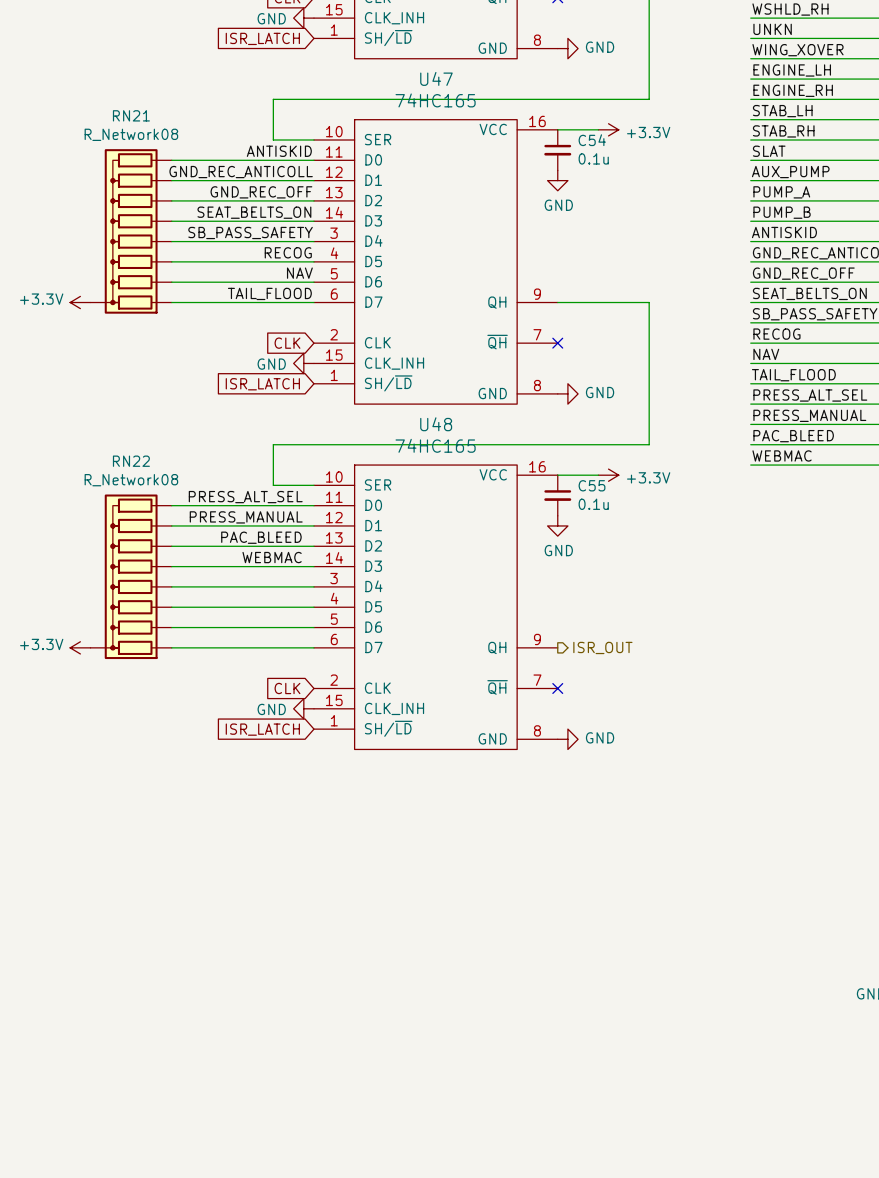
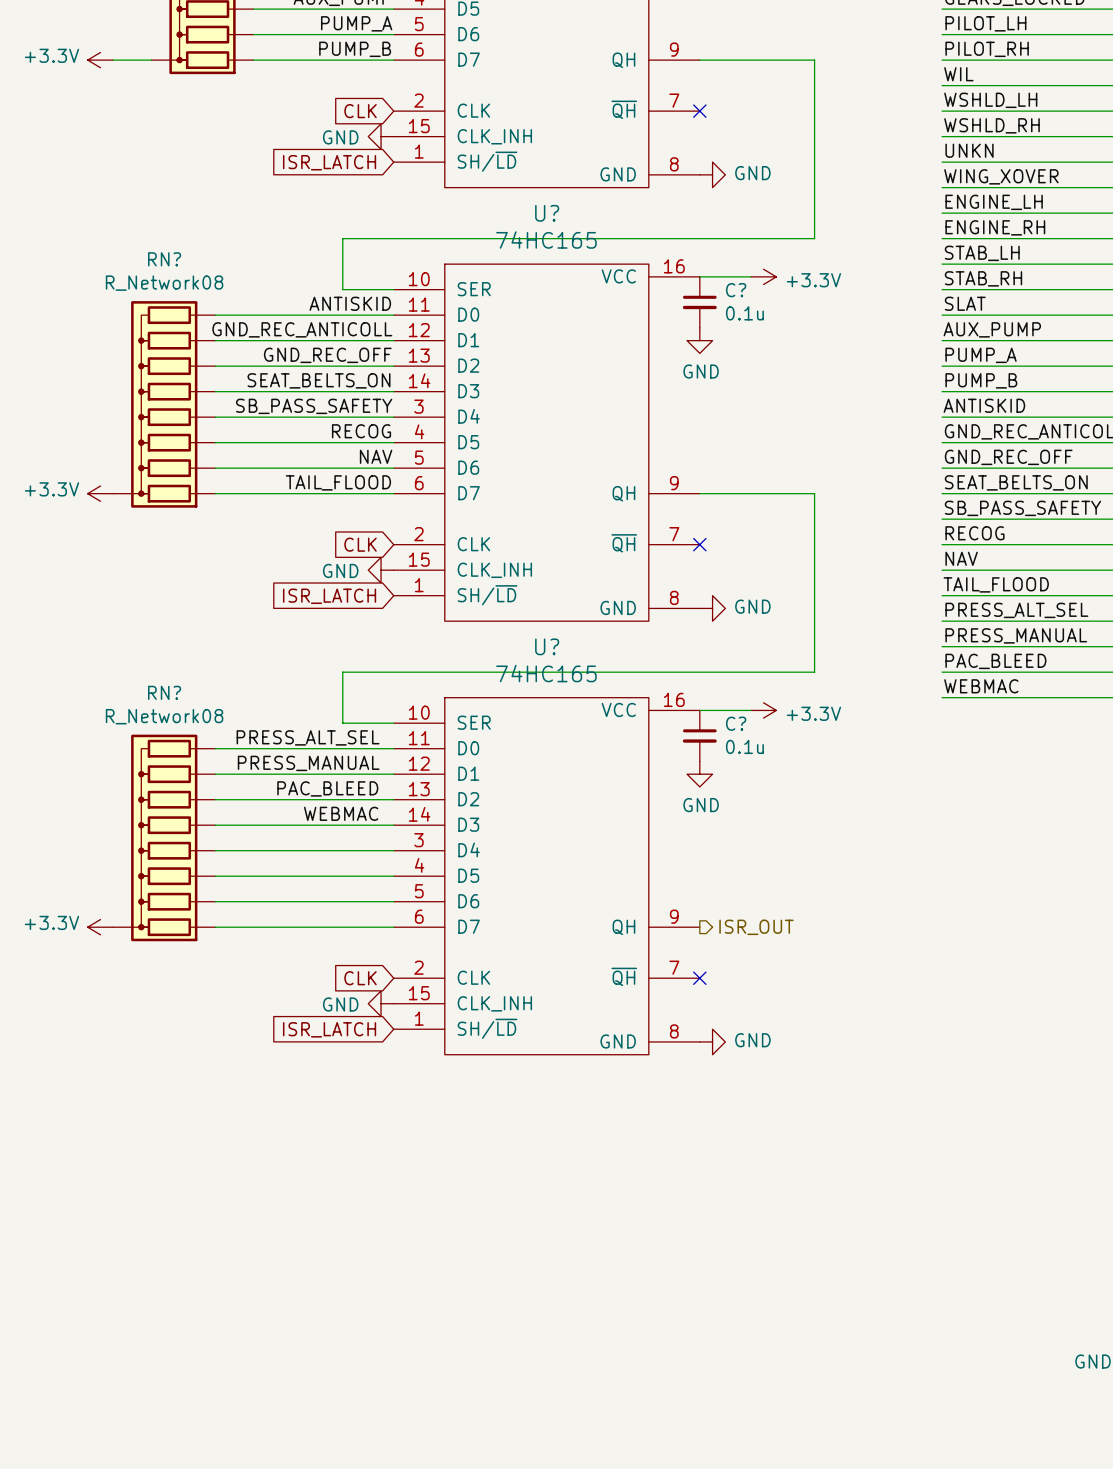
U47 name: U47 (436, 78) -> U? (547, 213)
RN21 name: RN21 (131, 115) -> RN? (164, 259)
C54 name: C54 (592, 140) -> C? (736, 290)
U48 name: U48 (436, 424) -> U? (547, 646)
RN22 name: RN22 (131, 461) -> RN? (164, 692)
C55 name: C55 (592, 485) -> C? (736, 723)

